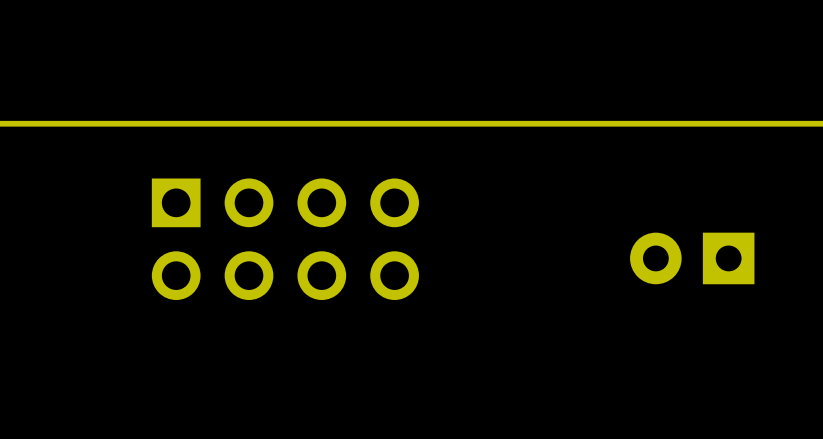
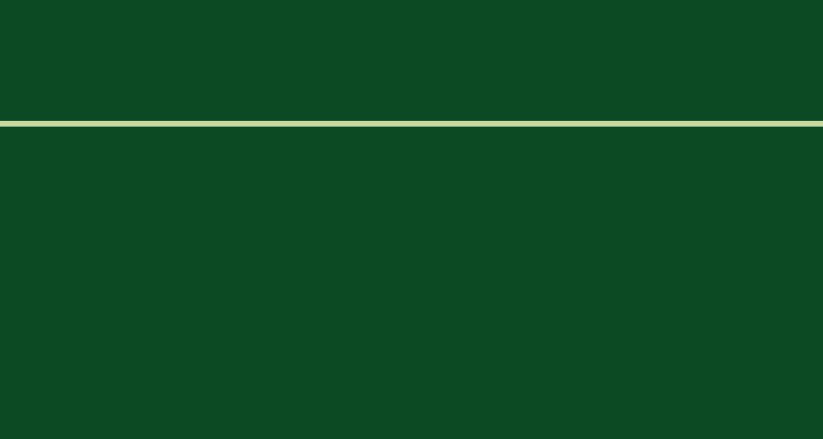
part: (285, 239) -> none
part: (692, 258) -> none

